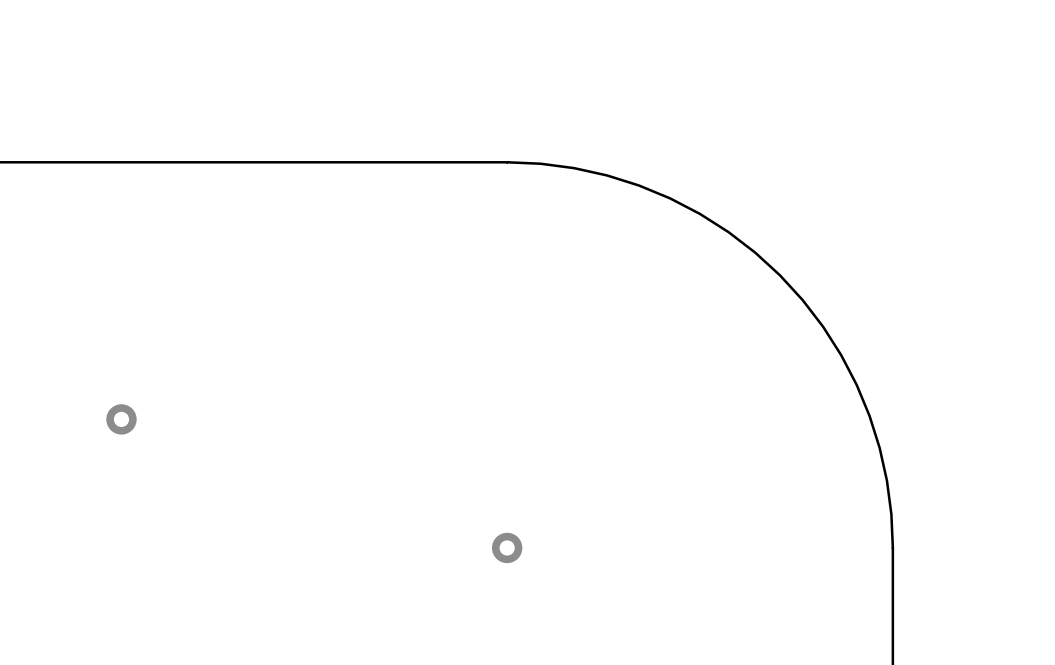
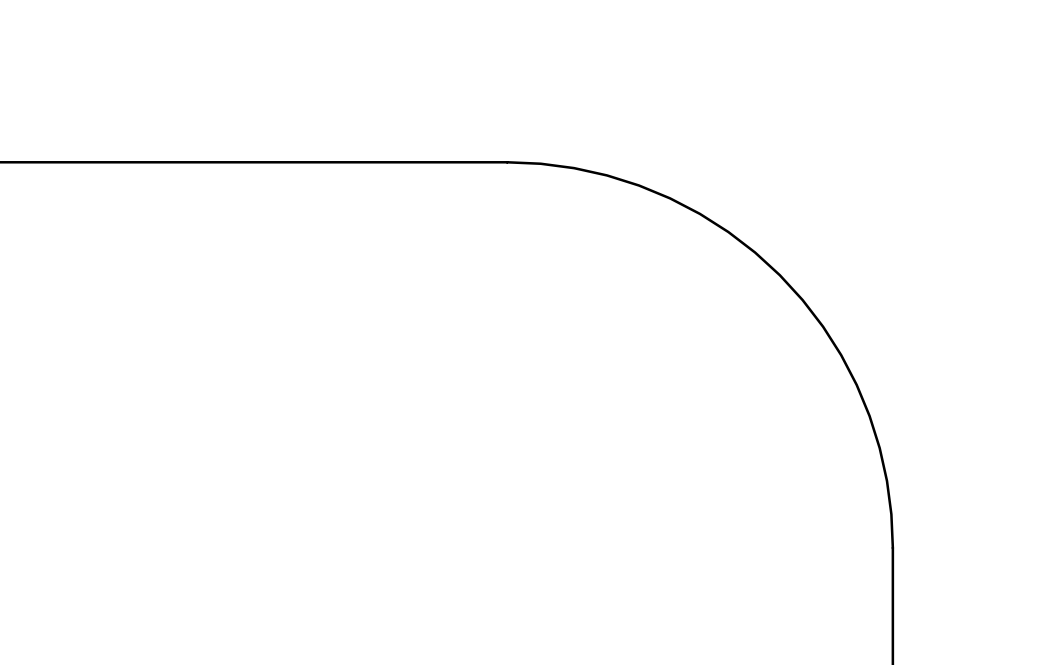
via: (121, 419) -> none
via: (507, 547) -> none

